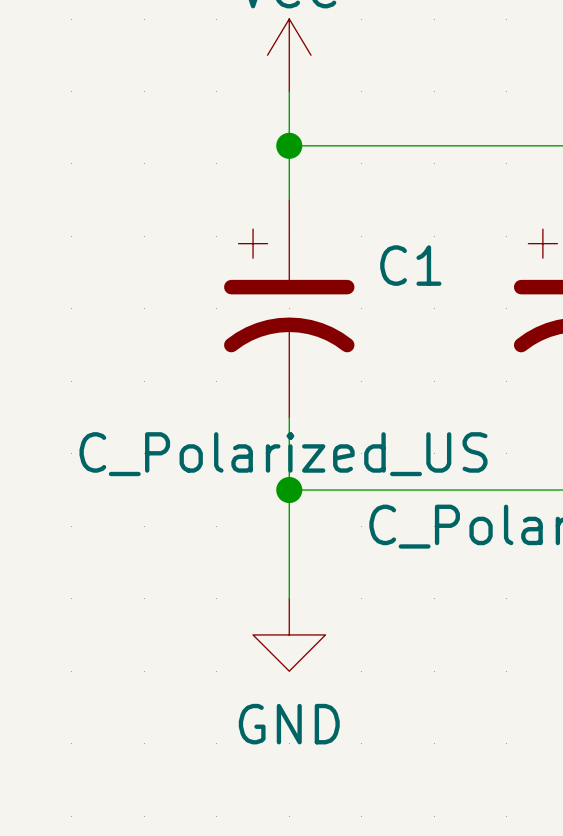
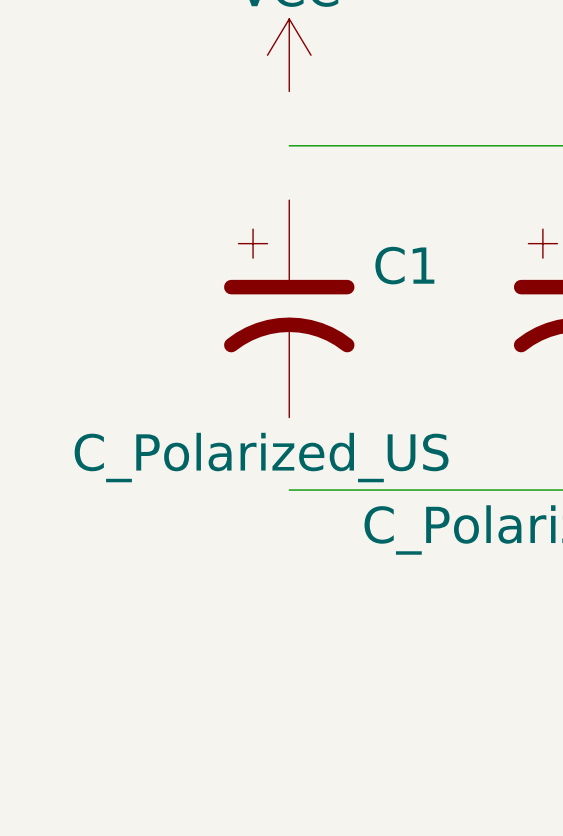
wire: (289, 91) (289, 200) -> none
junction: (289, 145) -> none
wire: (289, 417) (289, 598) -> none
junction: (289, 490) -> none
power symbol: GND (289, 634) -> none

